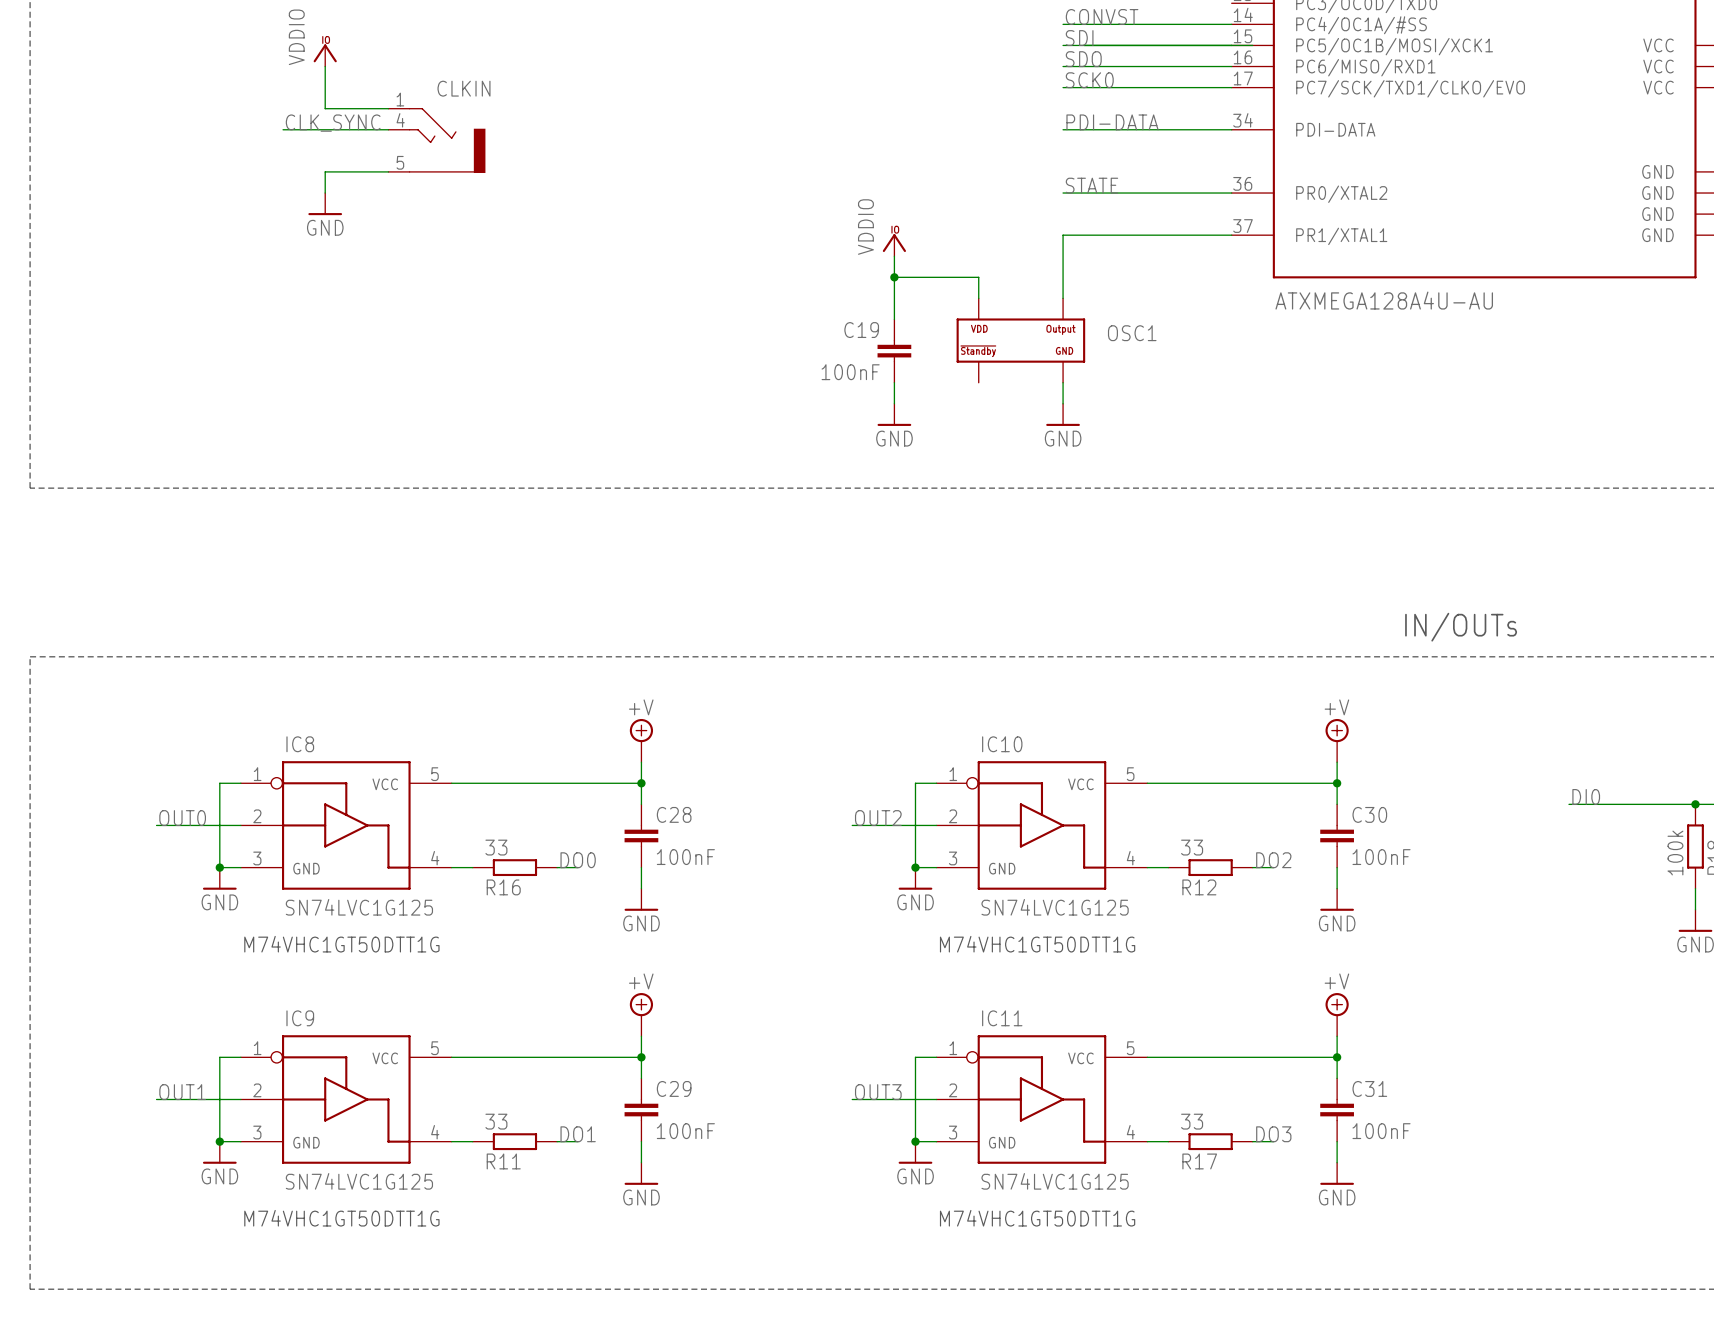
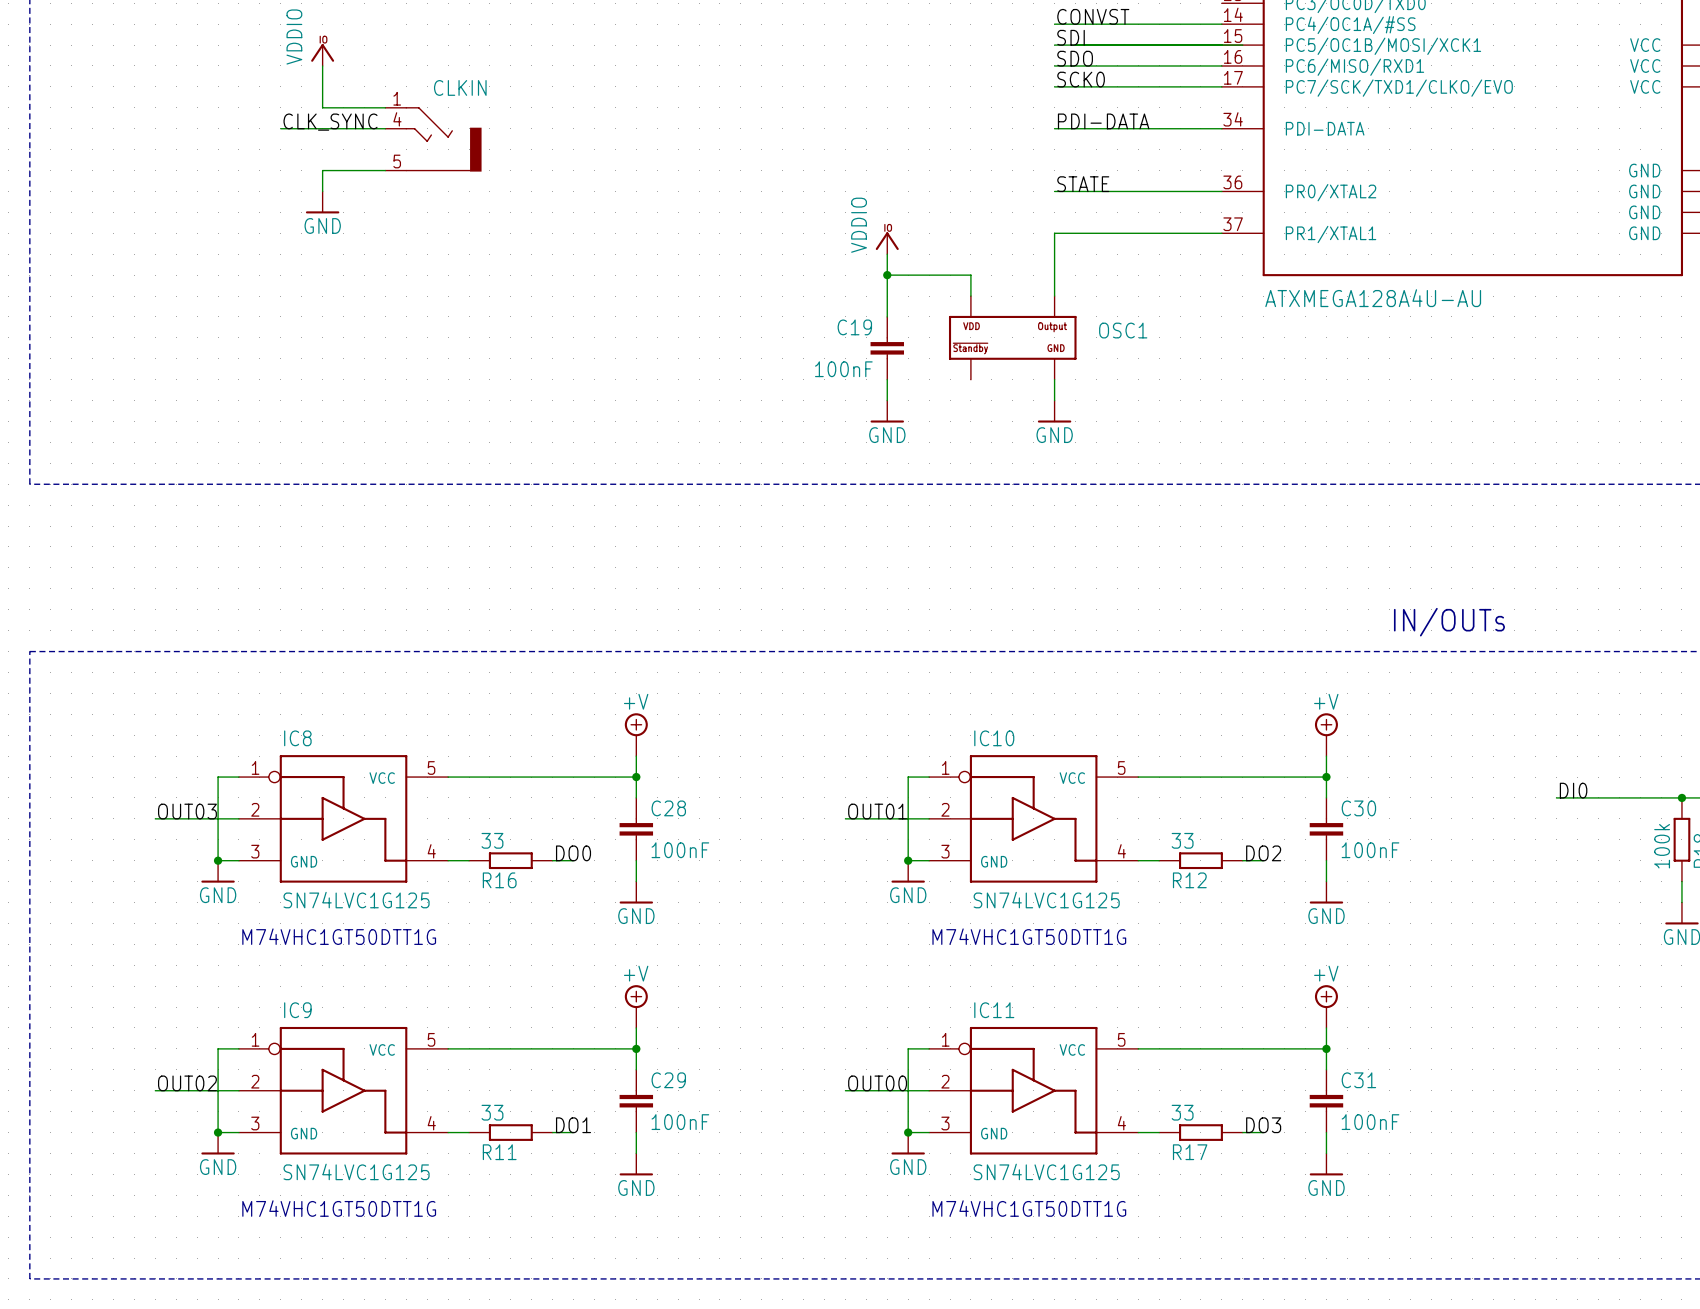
label: OUT0 (182, 818) -> OUT03 (187, 811)
label: OUT2 (878, 818) -> OUT01 (877, 811)
label: OUT1 (182, 1092) -> OUT02 (187, 1083)
label: OUT3 (878, 1092) -> OUT00 (877, 1083)

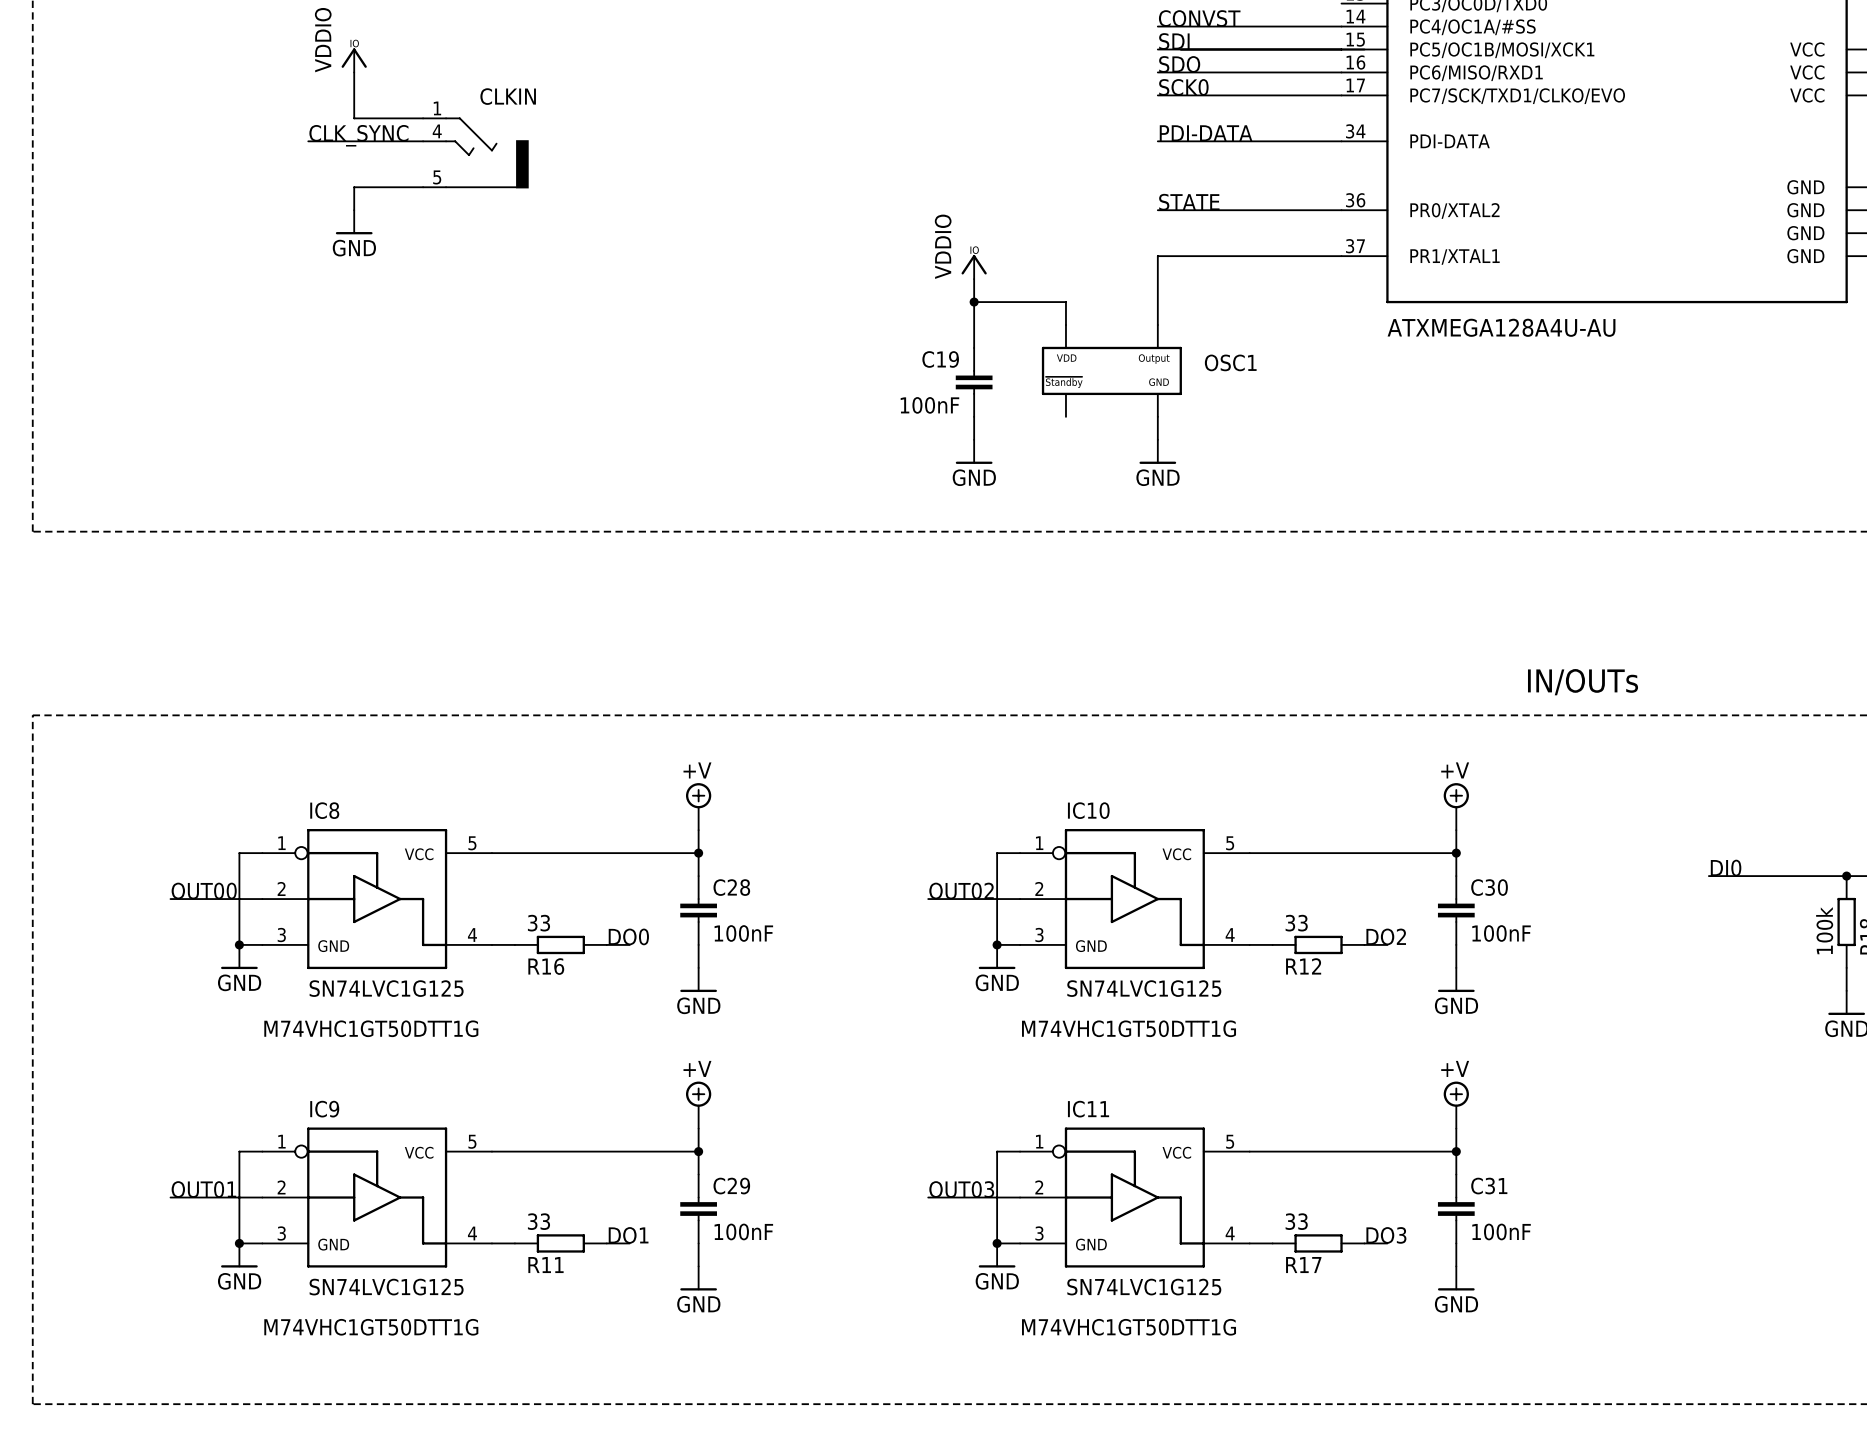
label: OUT03 (187, 811) -> OUT00 (204, 891)
label: OUT01 (877, 811) -> OUT02 (961, 891)
label: OUT02 (187, 1083) -> OUT01 (203, 1189)
label: OUT00 (877, 1083) -> OUT03 (961, 1189)

